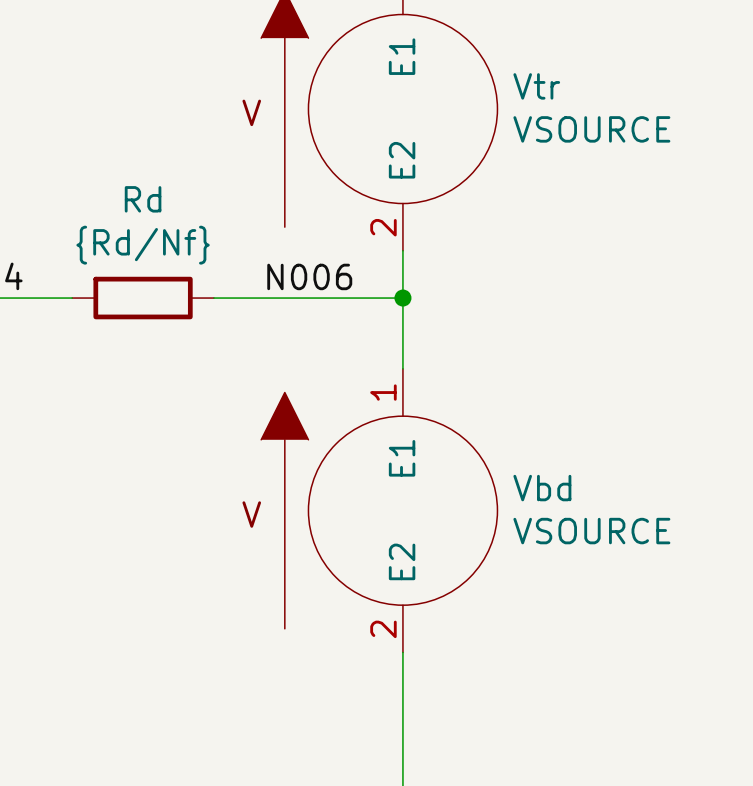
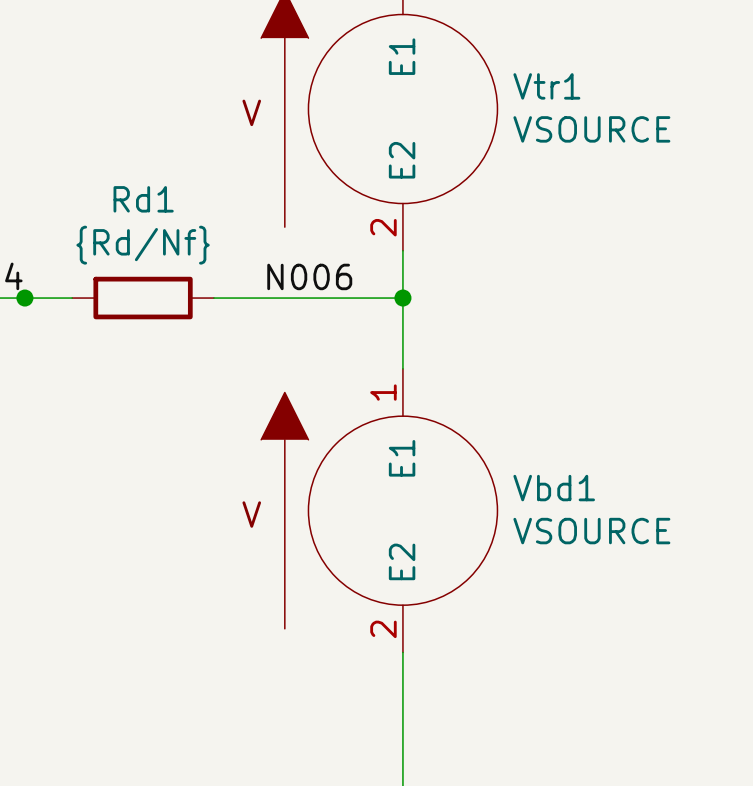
Vtr name: Vtr (536, 86) -> Vtr1 (546, 86)
Rd name: Rd (143, 199) -> Rd1 (143, 199)
junction: none -> (24, 298)
Vbd name: Vbd (542, 488) -> Vbd1 (554, 488)

